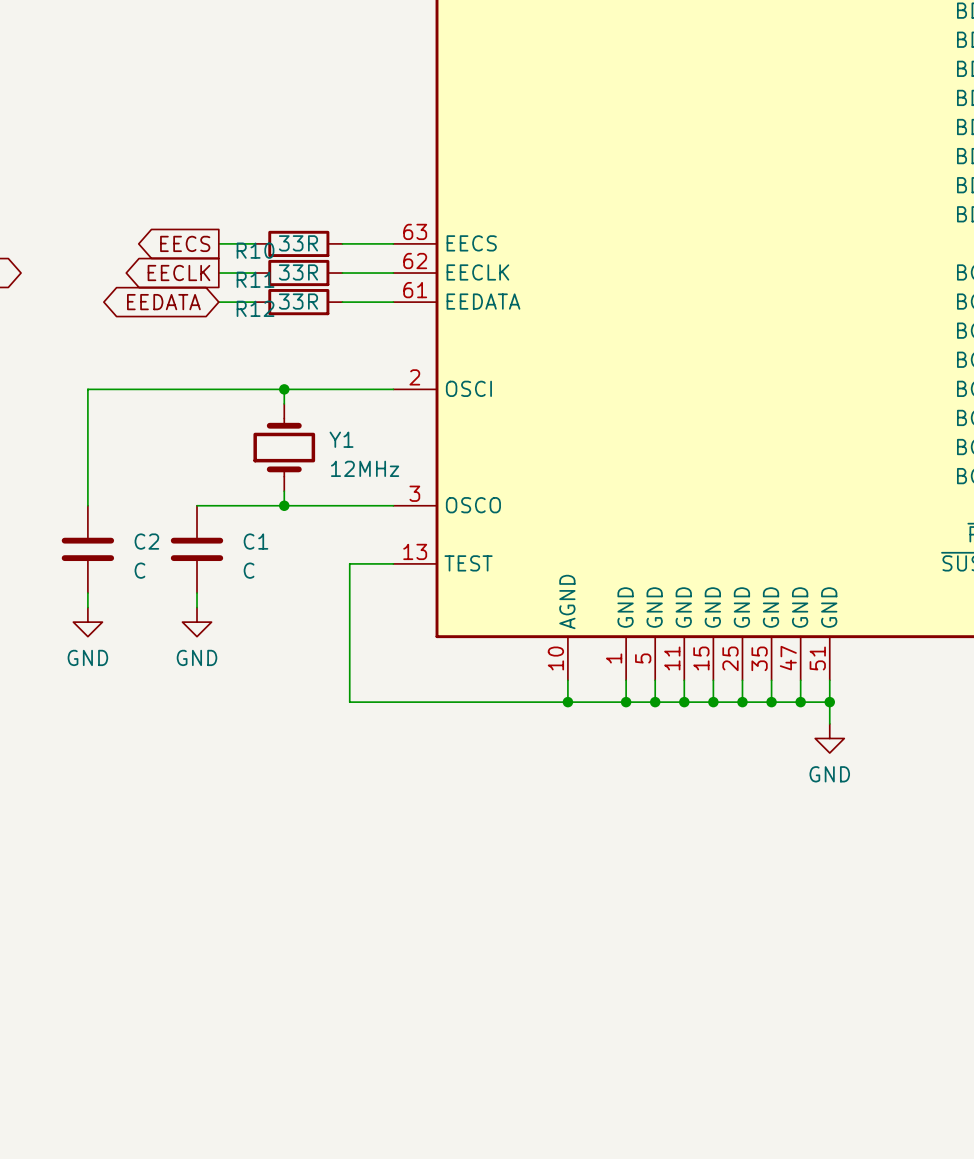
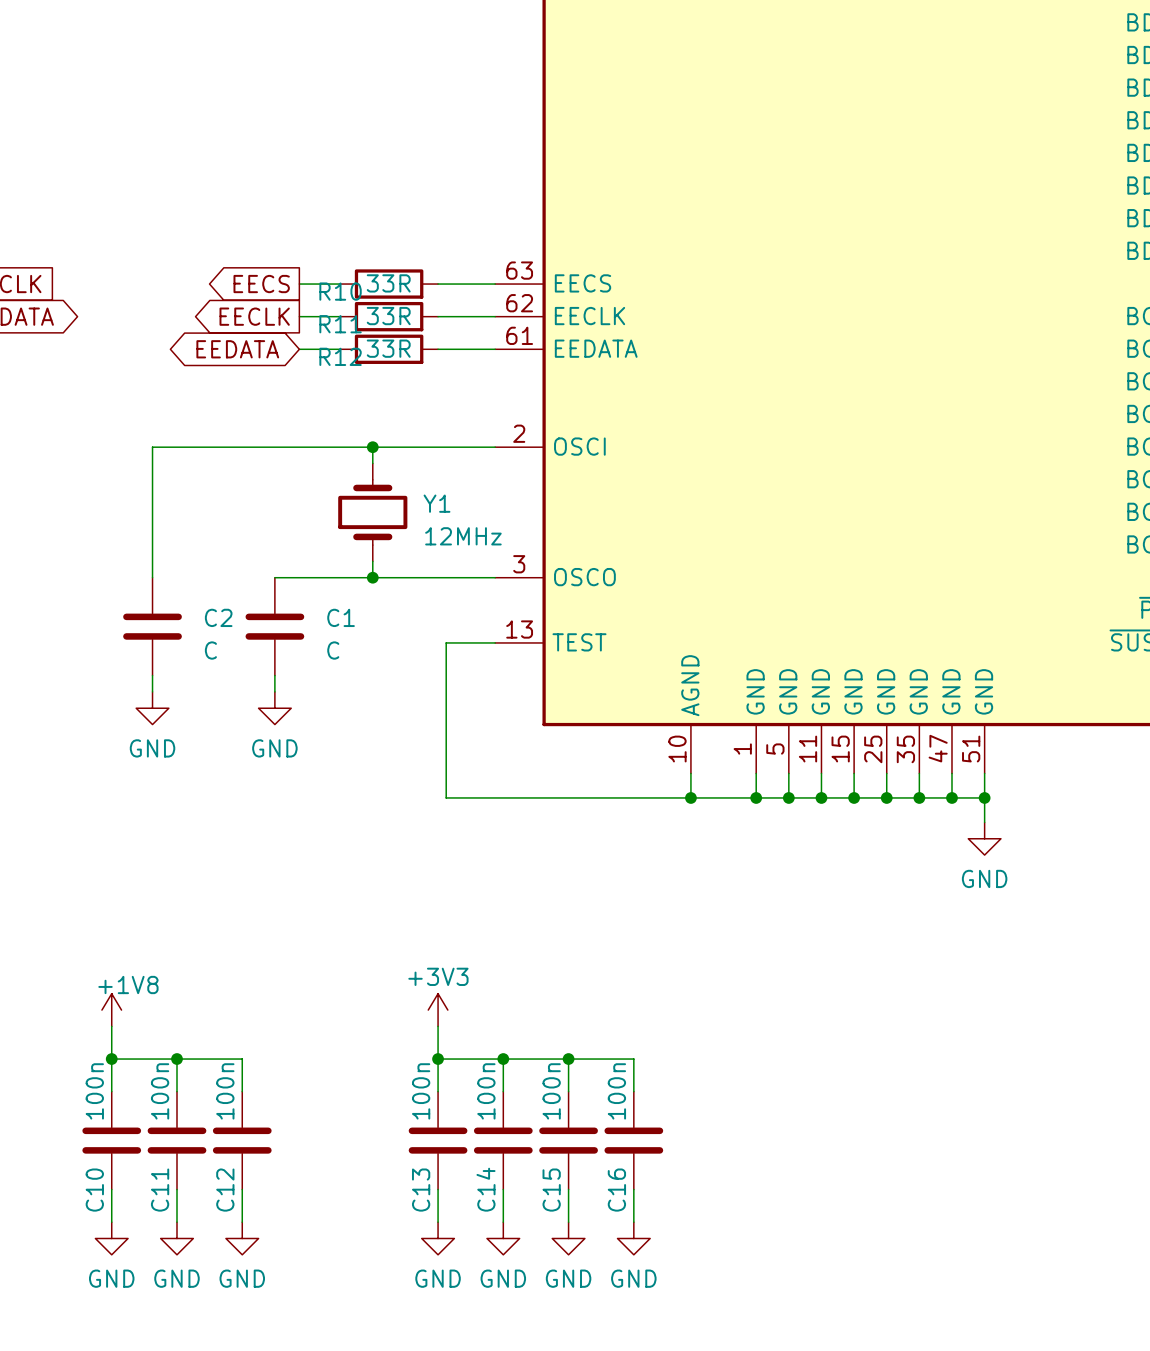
power symbol: none -> +1V8 (111, 1010)
power symbol: none -> +3V3 (438, 1010)
wire: none -> (111, 1026) (111, 1091)
wire: none -> (438, 1026) (438, 1091)
wire: none -> (111, 1059) (242, 1059) (242, 1091)
junction: none -> (111, 1059)
wire: none -> (177, 1059) (177, 1091)
junction: none -> (177, 1059)
wire: none -> (438, 1059) (633, 1059) (633, 1091)
junction: none -> (438, 1059)
wire: none -> (503, 1059) (503, 1091)
junction: none -> (503, 1059)
wire: none -> (568, 1059) (568, 1091)
junction: none -> (568, 1059)
C10: none -> 100n (111, 1140)
C11: none -> 100n (177, 1140)
C12: none -> 100n (242, 1140)
C13: none -> 100n (438, 1140)
C14: none -> 100n (503, 1140)
C15: none -> 100n (568, 1140)
C16: none -> 100n (633, 1140)
wire: none -> (111, 1189) (111, 1222)
wire: none -> (177, 1189) (177, 1222)
wire: none -> (242, 1189) (242, 1222)
wire: none -> (438, 1189) (438, 1222)
wire: none -> (503, 1189) (503, 1222)
wire: none -> (568, 1189) (568, 1222)
wire: none -> (633, 1189) (633, 1222)
power symbol: none -> GND (111, 1238)
power symbol: none -> GND (177, 1238)
power symbol: none -> GND (242, 1238)
power symbol: none -> GND (438, 1238)
power symbol: none -> GND (503, 1238)
power symbol: none -> GND (568, 1238)
power symbol: none -> GND (633, 1238)

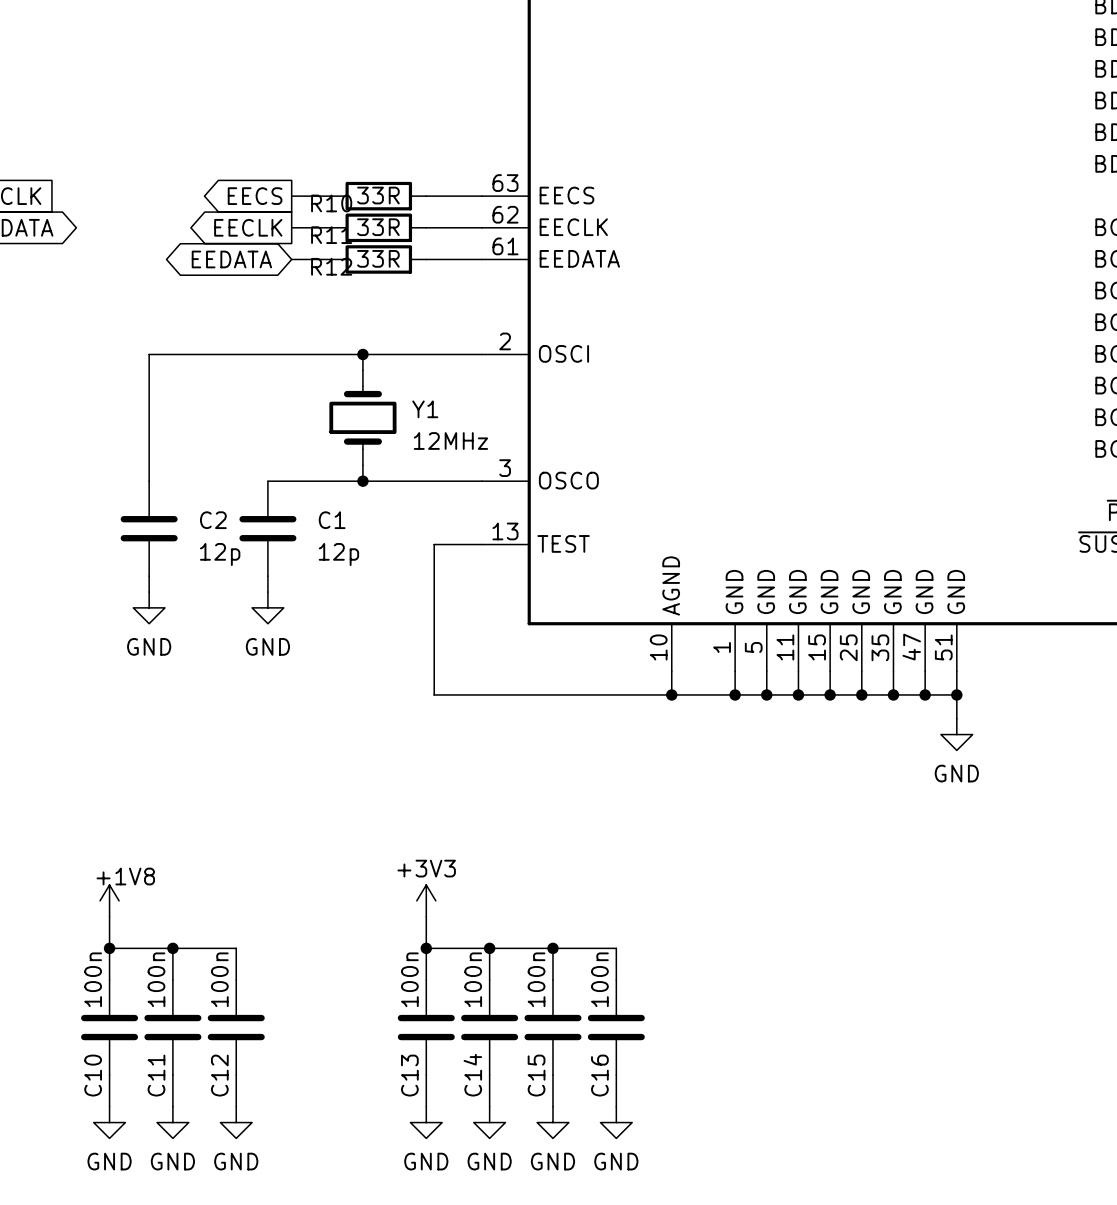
C2 value: C (210, 650) -> 12p (220, 554)
C1 value: C (333, 650) -> 12p (338, 554)

